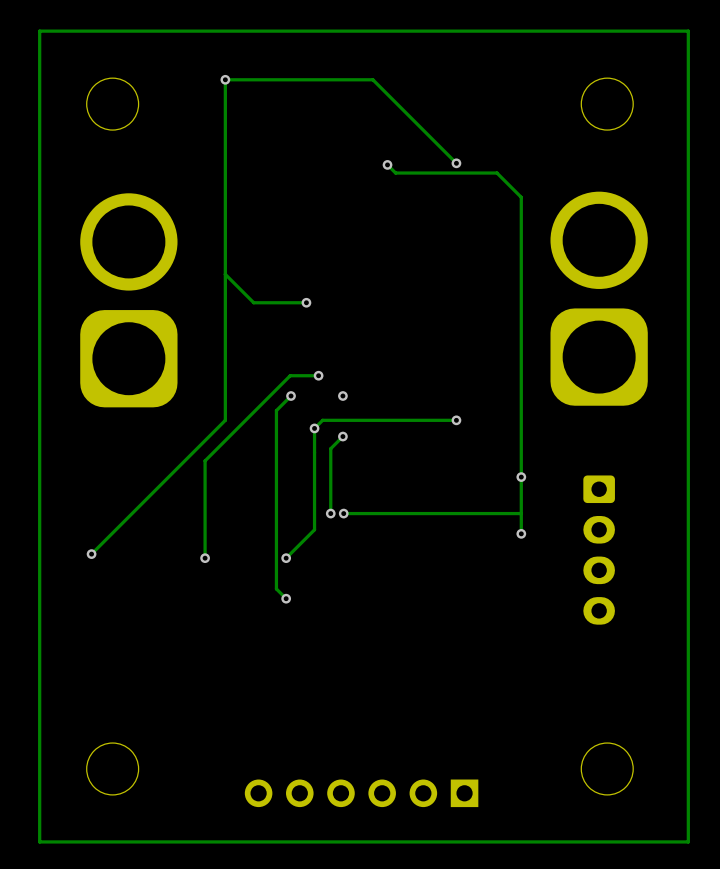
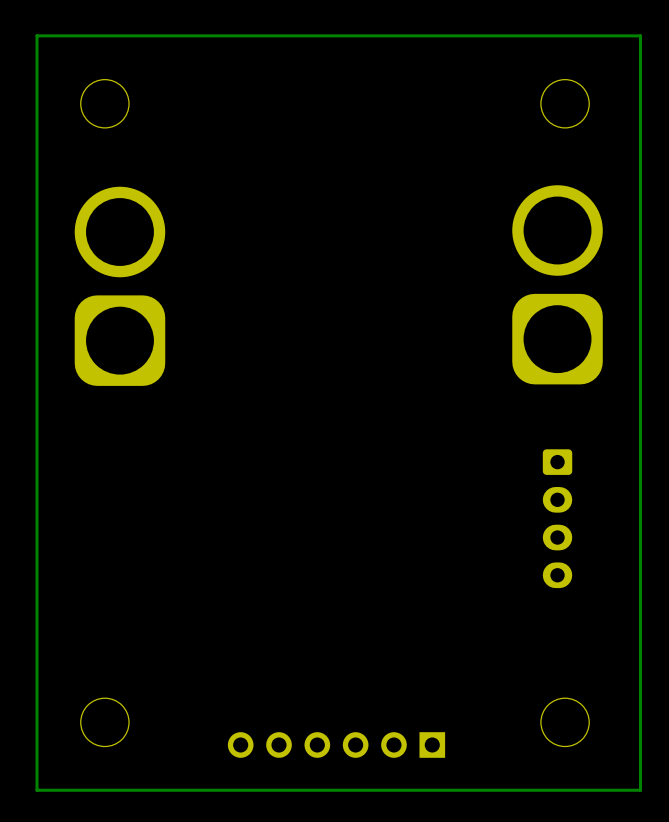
via: (225, 79) -> none
track: (456, 163) (372, 79) (225, 79) (225, 420) (91, 554) -> none
via: (456, 163) -> none
track: (387, 164) (395, 173) (496, 173) (521, 197) (521, 533) -> none
via: (387, 164) -> none
track: (225, 274) (253, 302) (306, 302) -> none
via: (306, 302) -> none
track: (318, 375) (290, 375) (205, 460) (205, 558) -> none
via: (318, 375) -> none
track: (291, 396) (276, 410) (276, 588) (286, 598) -> none
via: (291, 396) -> none
via: (342, 396) -> none
track: (456, 420) (322, 420) (314, 428) (314, 529) (286, 558) -> none
via: (456, 420) -> none
via: (314, 428) -> none
track: (342, 436) (330, 448) (330, 513) -> none
via: (342, 436) -> none
via: (521, 477) -> none
via: (330, 513) -> none
via: (343, 513) -> none
track: (521, 513) (343, 513) -> none
via: (521, 533) -> none
via: (91, 554) -> none
via: (205, 558) -> none
via: (286, 558) -> none
via: (286, 598) -> none

